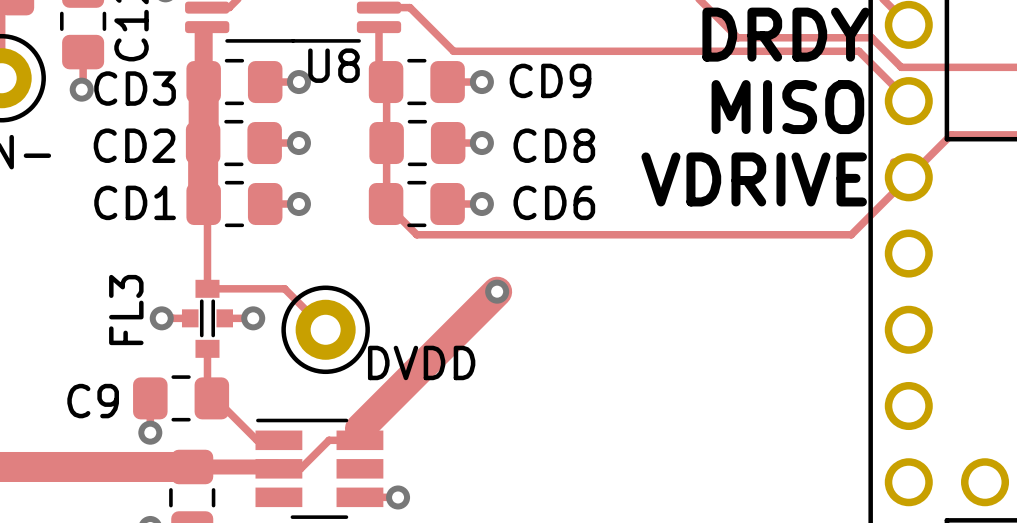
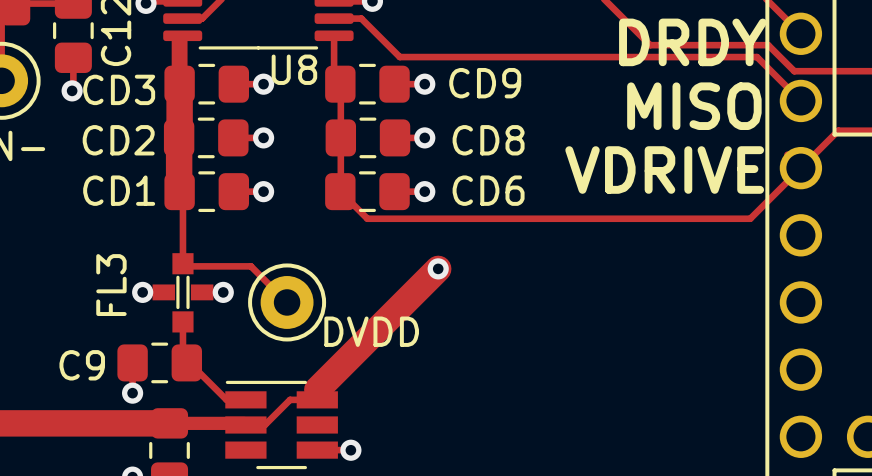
FL3 footprint: [181, 279, 233, 358] -> [152, 253, 214, 333]

